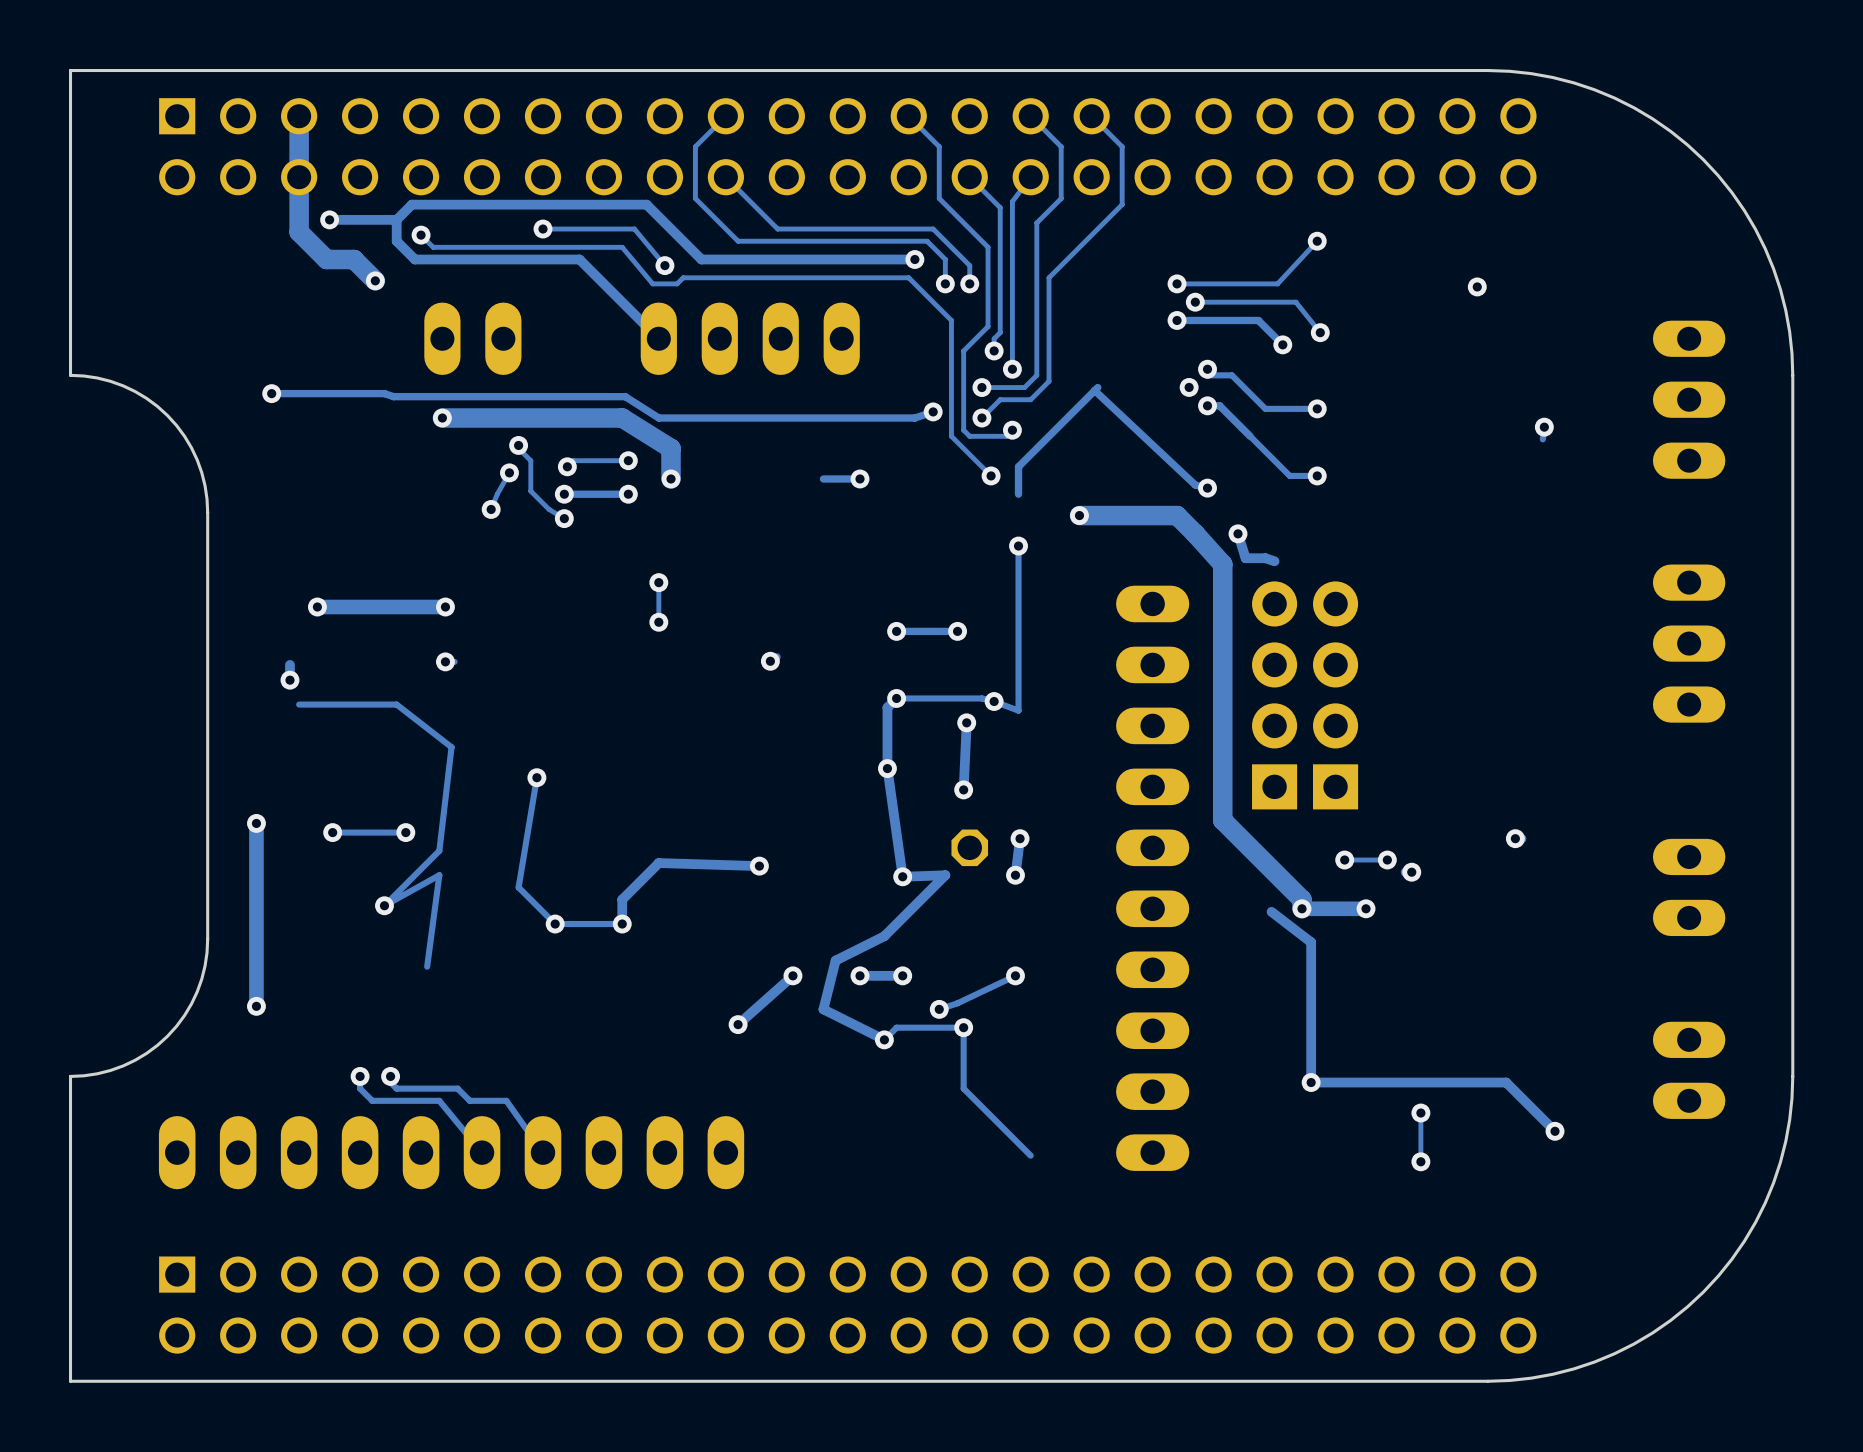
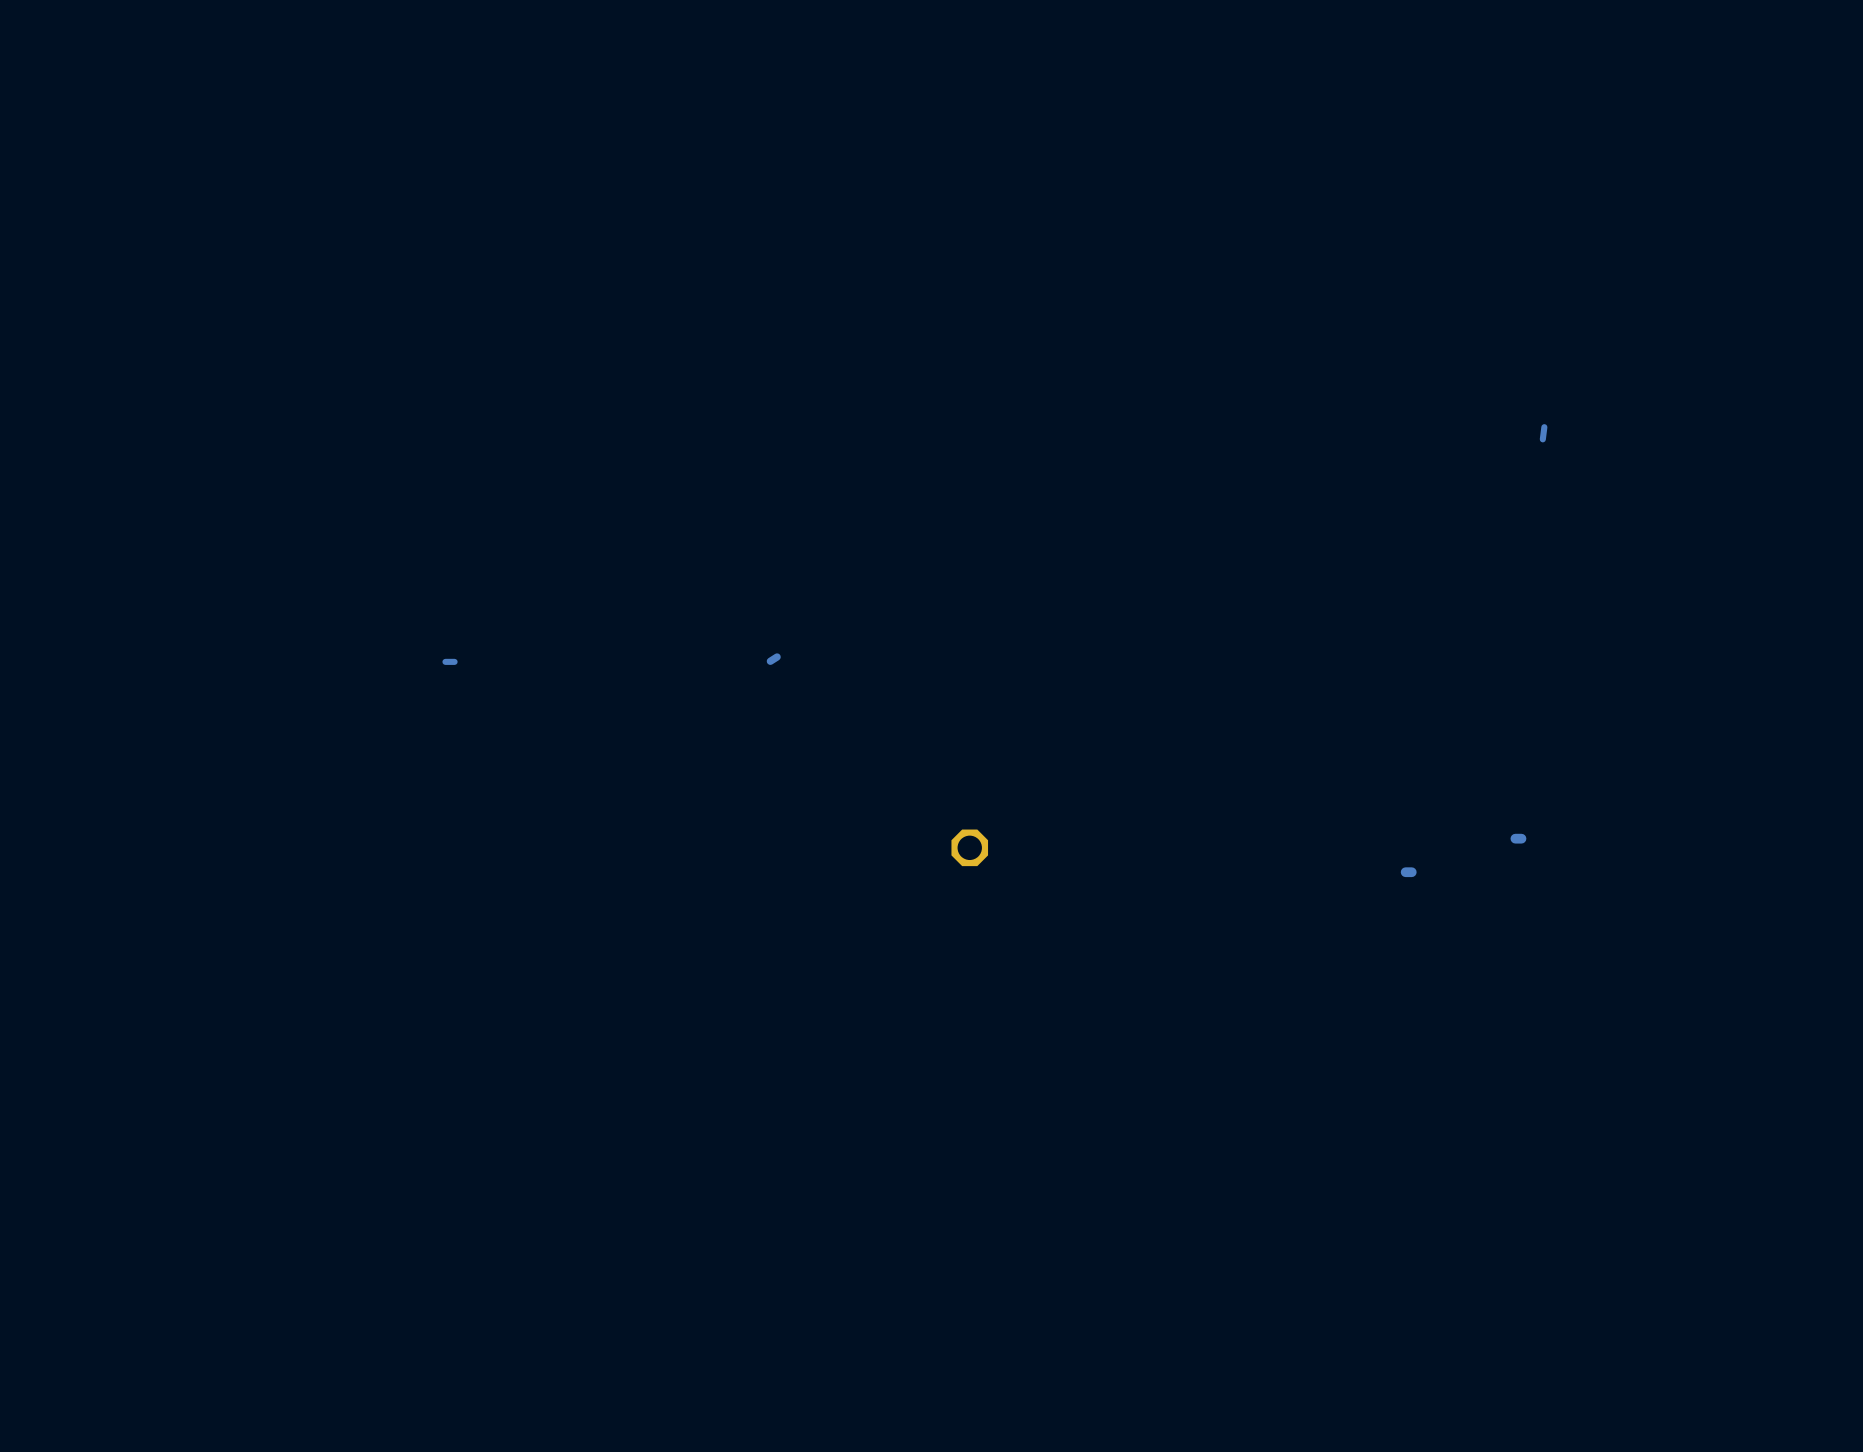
track: (299, 116) (299, 232) (326, 259) (354, 259) (375, 280) -> none
track: (725, 116) (695, 146) (695, 198) (738, 241) (927, 241) (945, 259) (945, 283) -> none
track: (908, 116) (939, 146) (939, 198) (988, 247) (988, 326) (963, 350) (963, 430) (969, 436) (1006, 436) (1012, 430) -> none
track: (1030, 116) (1061, 146) (1061, 198) (1036, 222) (1036, 375) (1024, 387) (981, 387) -> none
track: (1091, 116) (1122, 146) (1122, 204) (1049, 277) (1049, 381) (1030, 399) (1000, 399) (981, 418) -> none
track: (725, 177) (777, 229) (933, 229) (969, 265) (969, 283) -> none
track: (969, 177) (1000, 207) (1000, 332) (994, 338) (994, 350) -> none
track: (1030, 177) (1012, 201) (1012, 369) -> none
via: (329, 219) -> none
track: (396, 219) (411, 204) (646, 204) (701, 259) (914, 259) -> none
track: (396, 219) (396, 241) (414, 259) (579, 259) (658, 338) -> none
track: (396, 219) (329, 219) -> none
track: (542, 229) (634, 229) (664, 265) -> none
via: (542, 229) -> none
track: (421, 235) (433, 247) (622, 247) (652, 283) (677, 283) (683, 277) (908, 277) (951, 320) (951, 436) (991, 475) -> none
via: (421, 235) -> none
track: (1317, 241) (1277, 283) (1177, 283) -> none
via: (1317, 241) -> none
via: (914, 259) -> none
via: (664, 265) -> none
via: (375, 280) -> none
via: (945, 283) -> none
via: (969, 283) -> none
via: (1177, 283) -> none
via: (1477, 286) -> none
track: (1195, 302) (1295, 302) (1320, 332) -> none
via: (1195, 302) -> none
track: (1177, 320) (1258, 320) (1282, 344) -> none
via: (1177, 320) -> none
via: (1320, 332) -> none
part: (472, 338) -> none
part: (750, 338) -> none
via: (1282, 344) -> none
via: (994, 350) -> none
via: (1012, 369) -> none
track: (1207, 369) (1207, 375) (1231, 375) (1265, 408) (1317, 408) -> none
via: (1207, 369) -> none
via: (981, 387) -> none
track: (1097, 387) (1018, 466) (1018, 494) -> none
via: (1189, 387) -> none
track: (1094, 390) (1195, 485) (1207, 488) -> none
track: (271, 393) (384, 393) (393, 396) (625, 396) (658, 418) (914, 418) (933, 411) -> none
via: (271, 393) -> none
part: (1689, 399) -> none
track: (1207, 405) (1219, 405) (1289, 475) (1317, 475) -> none
via: (1207, 405) -> none
via: (1317, 408) -> none
via: (933, 411) -> none
track: (442, 418) (622, 418) (671, 448) (671, 478) -> none
via: (442, 418) -> none
via: (981, 418) -> none
via: (1544, 427) -> none
via: (1012, 430) -> none
track: (518, 445) (518, 448) (530, 460) (530, 491) (549, 509) (564, 518) -> none
via: (518, 445) -> none
track: (628, 460) (573, 460) (567, 466) -> none
via: (628, 460) -> none
via: (567, 466) -> none
track: (509, 472) (491, 509) -> none
via: (509, 472) -> none
via: (991, 475) -> none
via: (1317, 475) -> none
via: (671, 478) -> none
track: (860, 478) (823, 478) -> none
via: (860, 478) -> none
via: (1207, 488) -> none
via: (564, 494) -> none
track: (628, 494) (564, 494) -> none
via: (628, 494) -> none
via: (491, 509) -> none
track: (1079, 515) (1177, 515) (1195, 533) -> none
via: (1079, 515) -> none
via: (564, 518) -> none
track: (1195, 533) (1222, 564) (1222, 820) (1302, 899) (1302, 908) (1366, 908) -> none
track: (1238, 533) (1245, 558) (1265, 558) (1274, 561) -> none
via: (1238, 533) -> none
track: (1018, 546) (1018, 710) (981, 698) (896, 698) (887, 707) (887, 768) (902, 876) (945, 875) (884, 936) (835, 960) (823, 1009) (884, 1039) (896, 1027) (963, 1027) (963, 1088) (1030, 1155) -> none
via: (1018, 546) -> none
track: (658, 582) (658, 622) -> none
via: (658, 582) -> none
via: (317, 607) -> none
track: (445, 607) (317, 607) -> none
via: (445, 607) -> none
via: (658, 622) -> none
via: (896, 631) -> none
track: (957, 631) (896, 631) -> none
via: (957, 631) -> none
part: (1689, 643) -> none
via: (445, 661) -> none
via: (770, 661) -> none
track: (289, 664) (289, 680) -> none
via: (289, 680) -> none
part: (1274, 695) -> none
part: (1335, 695) -> none
via: (896, 698) -> none
via: (994, 701) -> none
track: (299, 704) (396, 704) (451, 747) (439, 850) (384, 905) (439, 875) (427, 966) -> none
track: (966, 722) (963, 789) -> none
via: (966, 722) -> none
part: (931, 725) -> none
via: (887, 768) -> none
track: (536, 777) (518, 887) (555, 924) (622, 924) (622, 899) (658, 863) (759, 866) -> none
via: (536, 777) -> none
via: (963, 789) -> none
track: (256, 823) (256, 1006) -> none
via: (256, 823) -> none
via: (332, 832) -> none
track: (405, 832) (332, 832) -> none
via: (405, 832) -> none
track: (1020, 838) (1015, 875) -> none
via: (1020, 838) -> none
via: (1515, 838) -> none
via: (1344, 860) -> none
track: (1387, 860) (1344, 860) -> none
via: (1387, 860) -> none
via: (759, 866) -> none
via: (1411, 872) -> none
via: (1015, 875) -> none
via: (902, 876) -> none
part: (1152, 878) -> none
part: (1689, 887) -> none
via: (384, 905) -> none
via: (1302, 908) -> none
via: (1366, 908) -> none
track: (1271, 911) (1311, 942) (1311, 1082) (1506, 1082) (1555, 1131) -> none
via: (555, 924) -> none
via: (622, 924) -> none
track: (792, 975) (738, 1024) -> none
via: (792, 975) -> none
via: (860, 975) -> none
track: (902, 975) (860, 975) -> none
via: (902, 975) -> none
track: (1015, 975) (957, 1003) (939, 1009) -> none
via: (1015, 975) -> none
via: (256, 1006) -> none
via: (939, 1009) -> none
via: (738, 1024) -> none
via: (963, 1027) -> none
via: (884, 1039) -> none
part: (1689, 1070) -> none
track: (360, 1076) (360, 1088) (372, 1100) (439, 1100) (482, 1152) -> none
via: (360, 1076) -> none
track: (390, 1076) (390, 1082) (396, 1088) (457, 1088) (469, 1100) (506, 1100) (542, 1152) -> none
via: (390, 1076) -> none
via: (1311, 1082) -> none
track: (1420, 1113) (1420, 1161) -> none
via: (1420, 1113) -> none
via: (1555, 1131) -> none
part: (451, 1152) -> none
via: (1420, 1161) -> none

